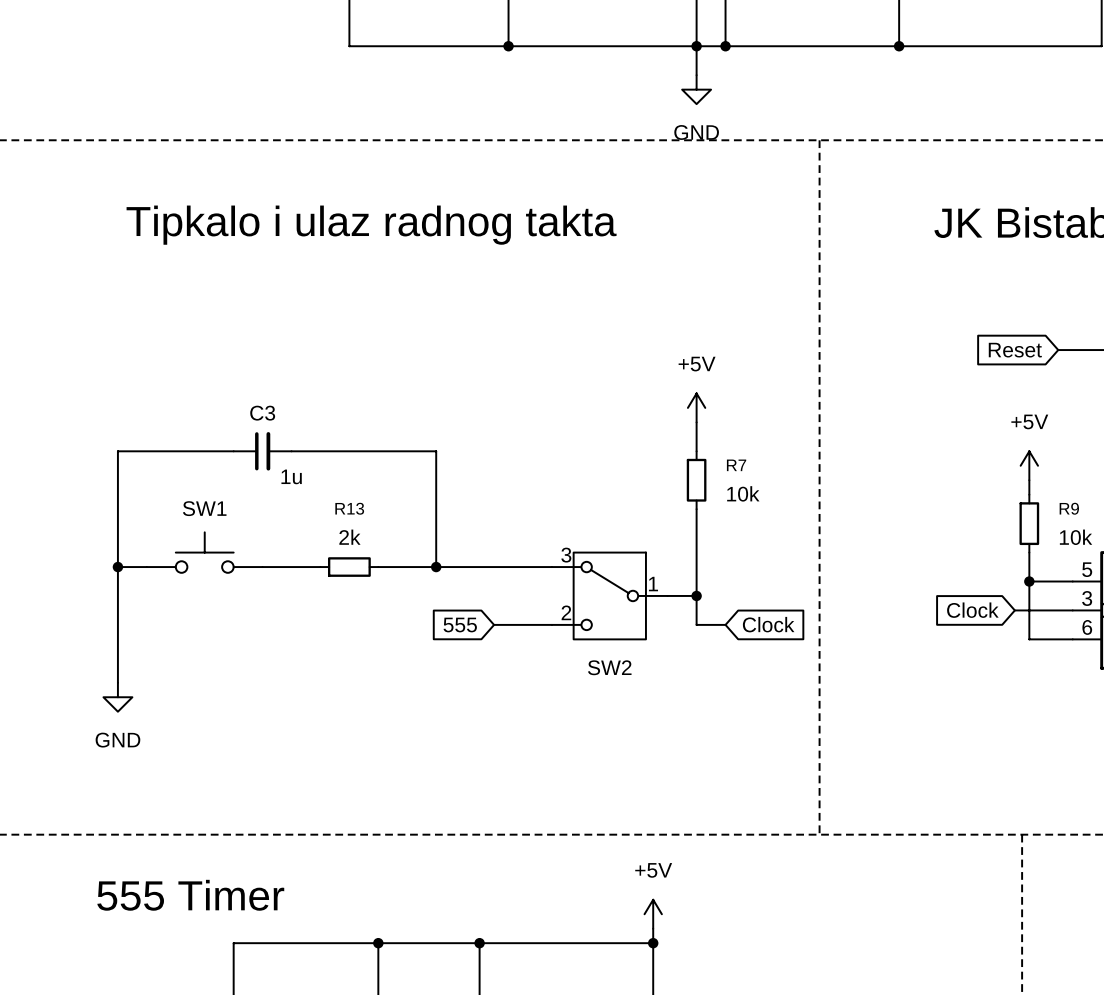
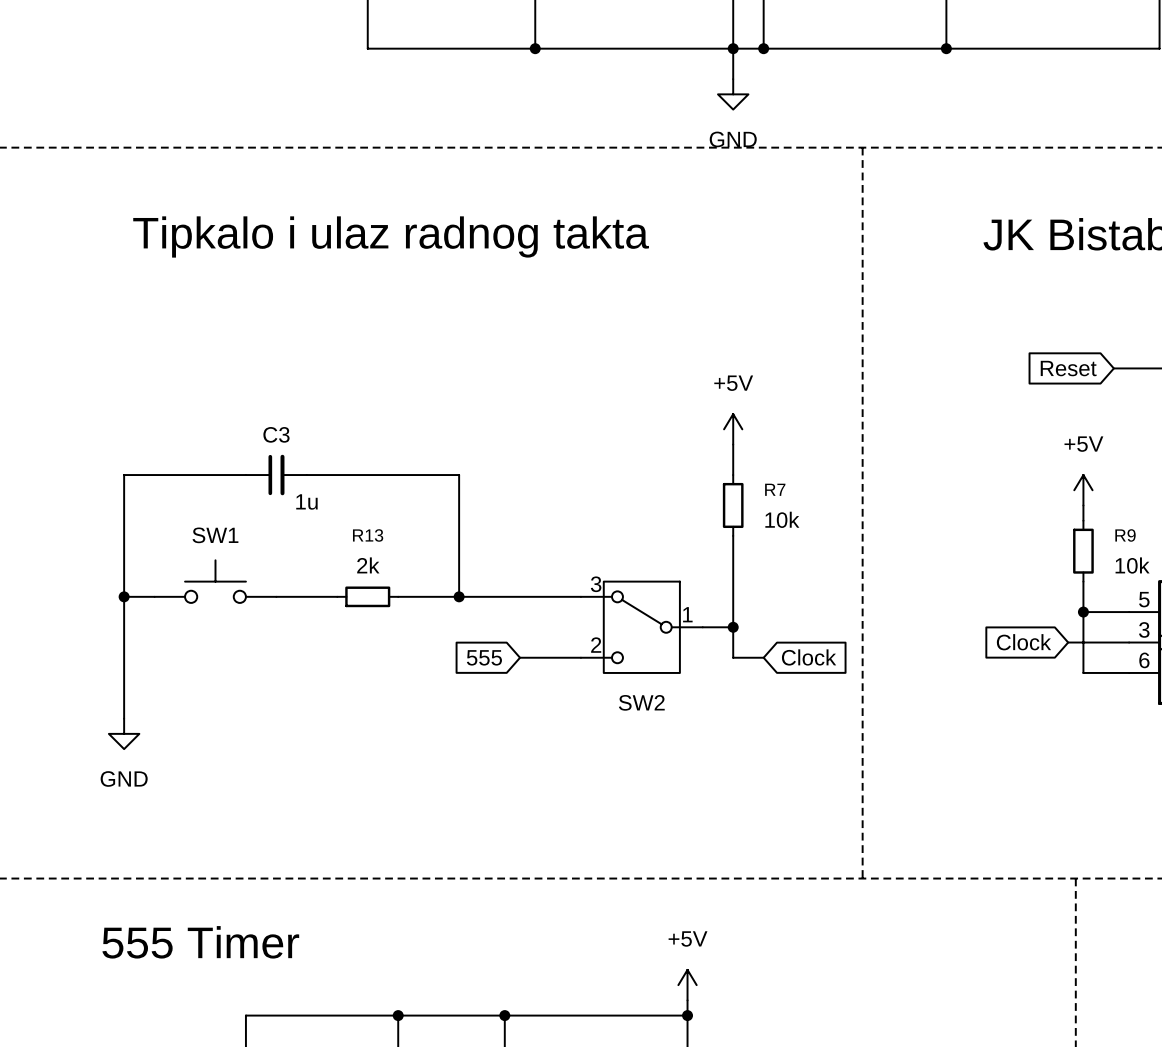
power symbol position: +5V (653, 914) -> +5V (687, 985)
wire: (378, 943) (378, 964) -> none
junction position: (378, 943) -> (398, 1015)
wire: (479, 943) (479, 964) -> none
junction position: (479, 943) -> (504, 1015)
wire: (653, 943) (233, 943) (233, 964) -> (687, 1015) (245, 1015)
junction position: (653, 943) -> (687, 1015)

